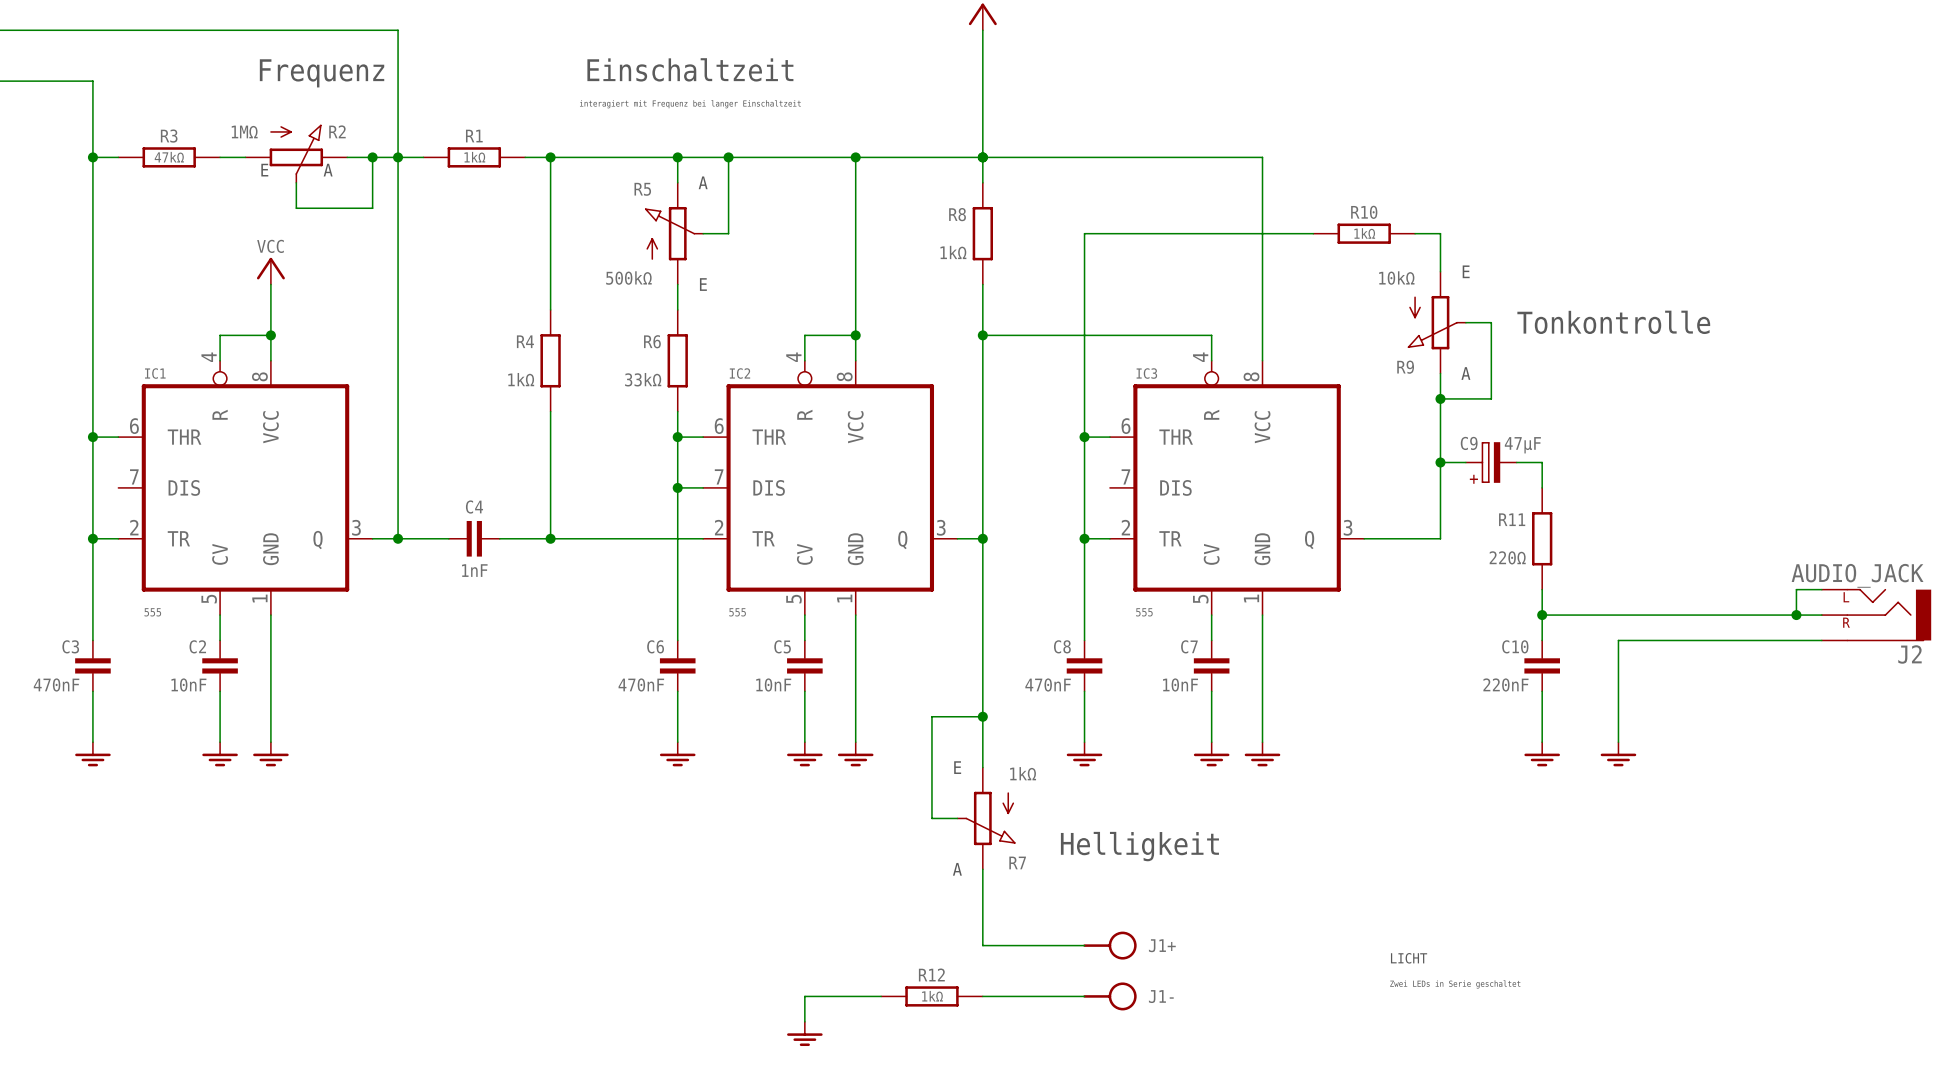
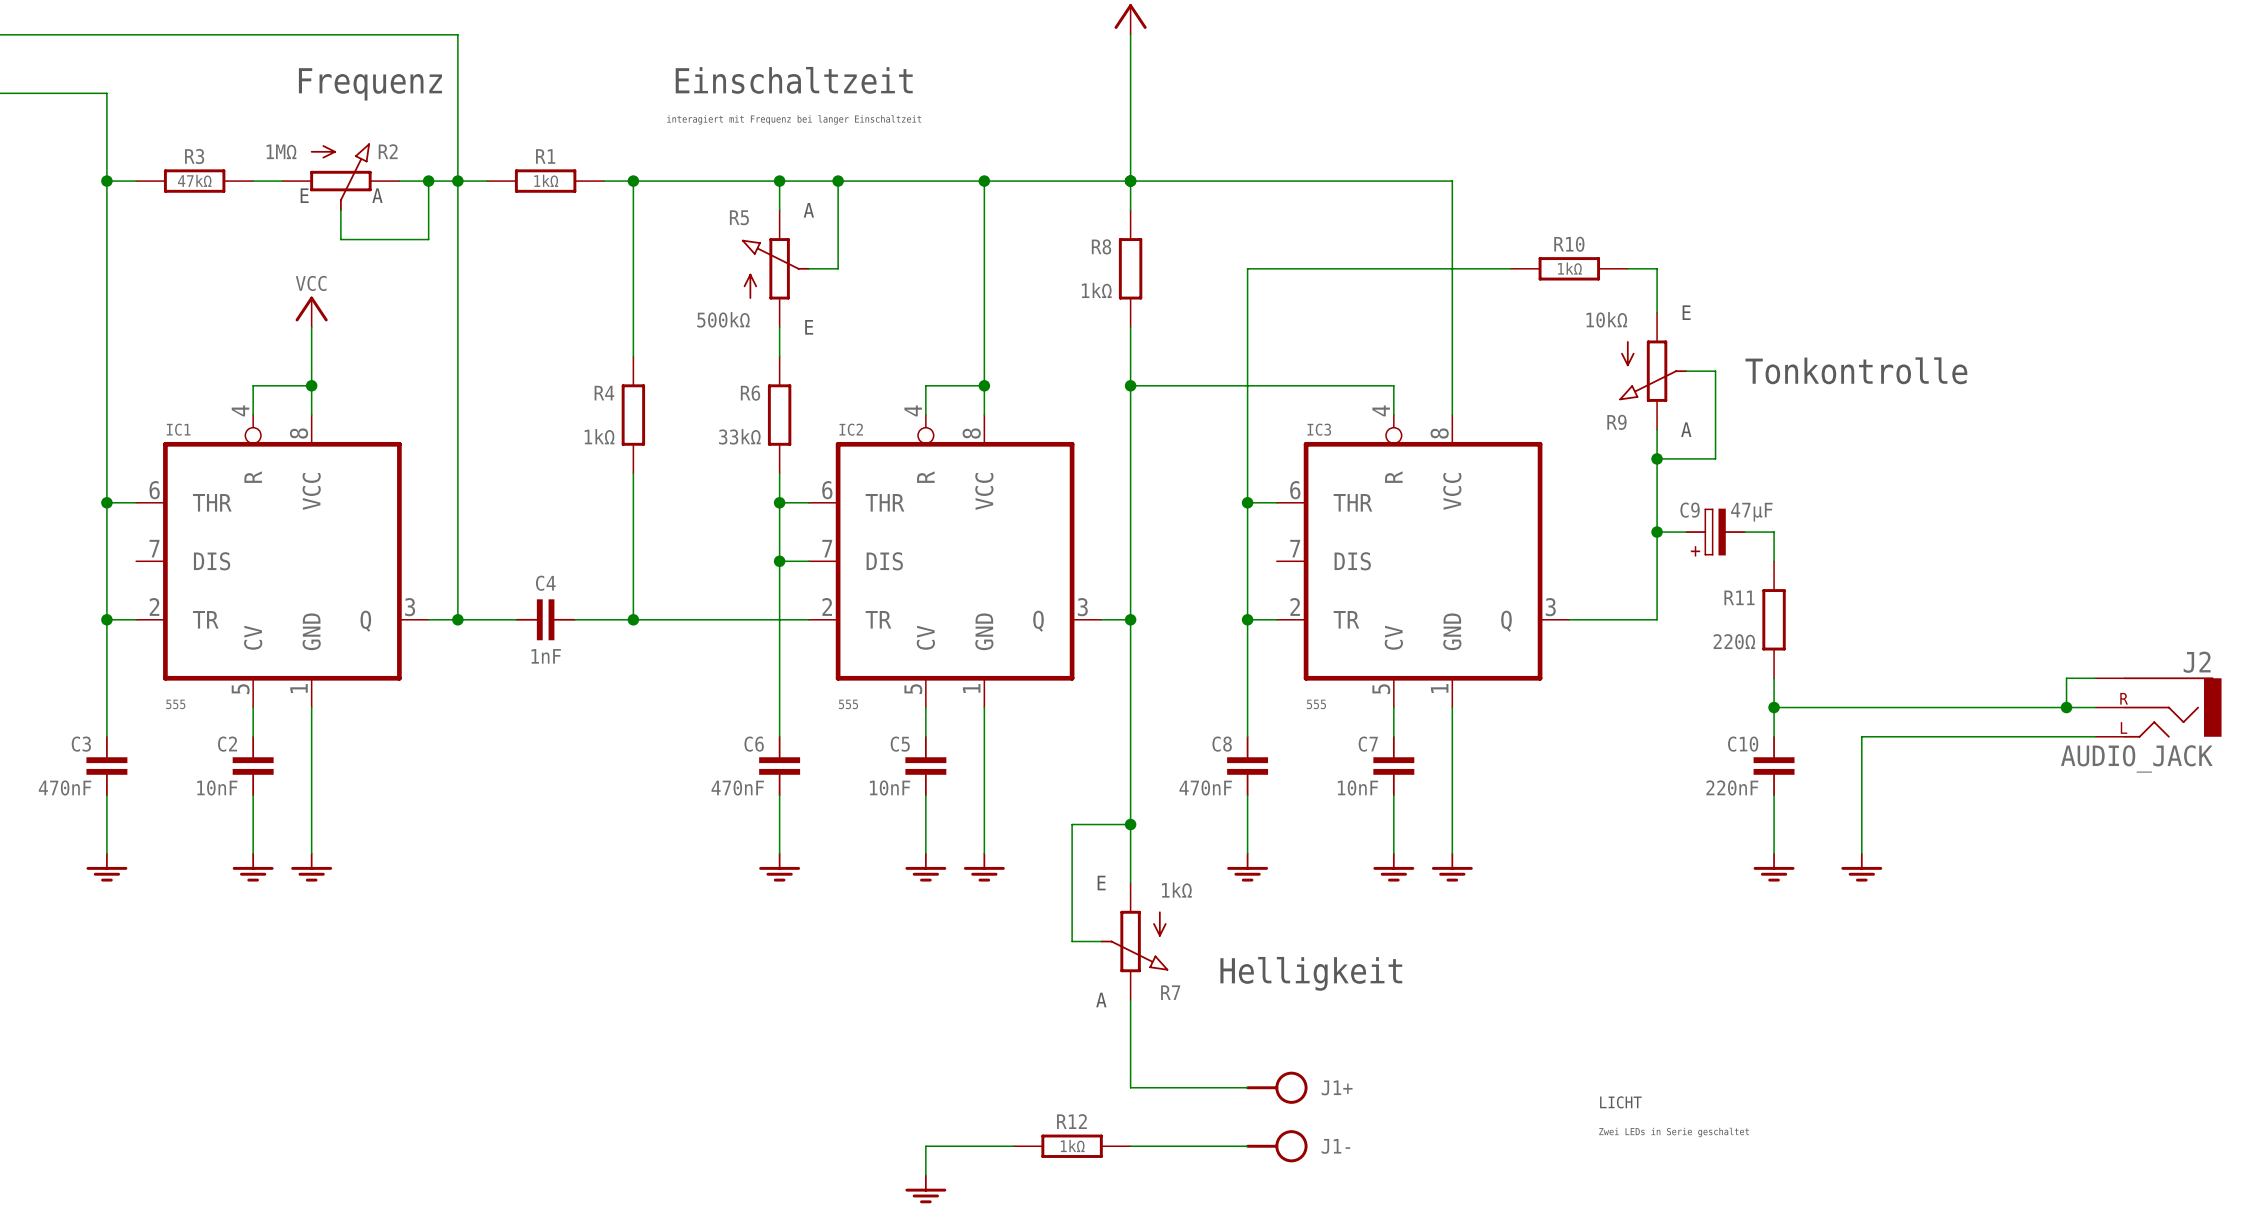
J2 value position: AUDIO_JACK (1857, 575) -> AUDIO_JACK (2136, 758)
J2 symbol: [1821, 588, 1932, 642] -> [2095, 677, 2222, 738]
J2 name position: J2 (1909, 654) -> J2 (2197, 662)

